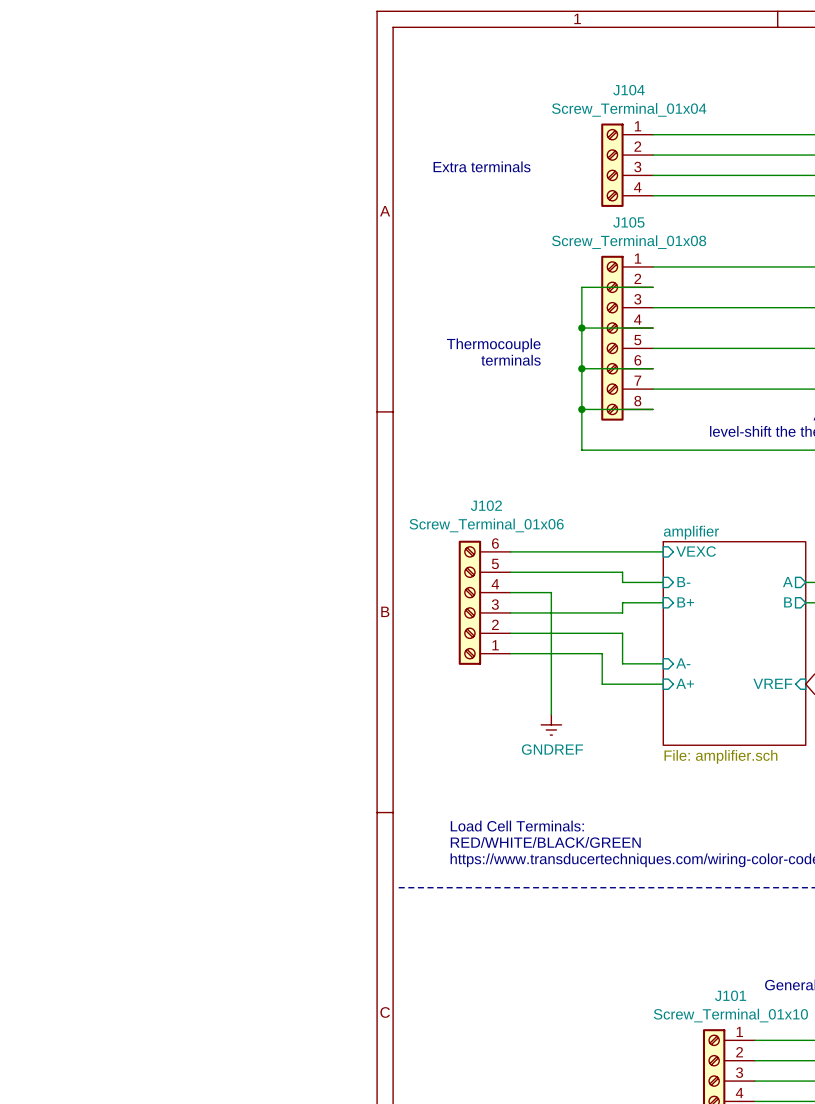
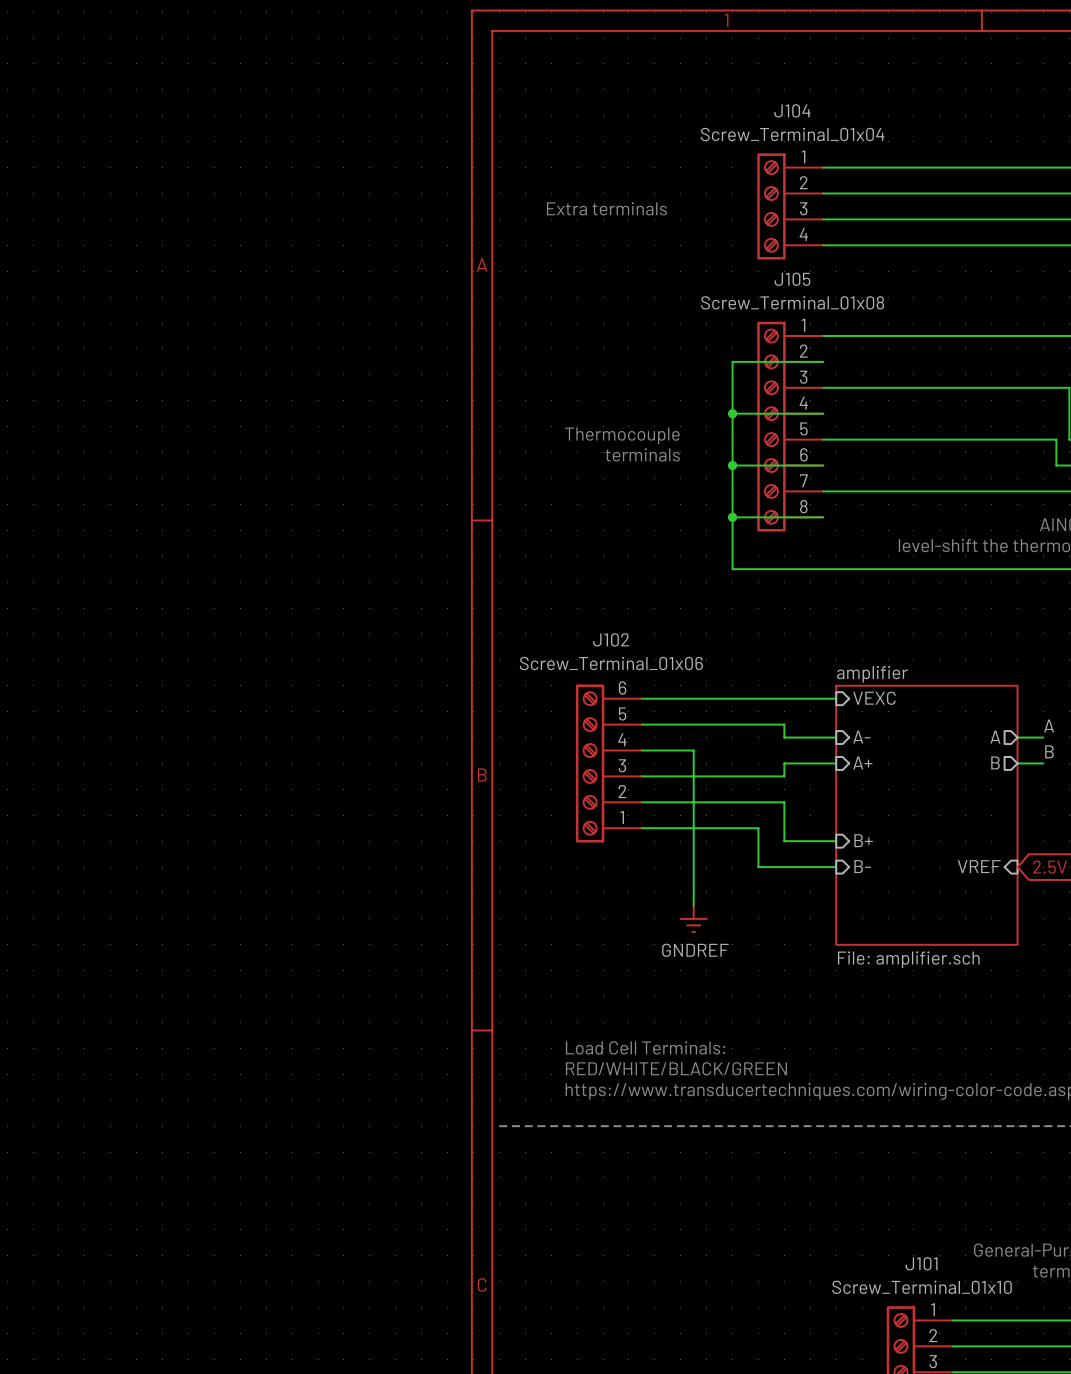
sheet pin: B- (683, 582) -> A- (861, 737)
sheet pin: B+ (685, 602) -> A+ (862, 762)
sheet pin: A- (683, 663) -> B+ (863, 840)
sheet pin: A+ (685, 683) -> B- (862, 866)

